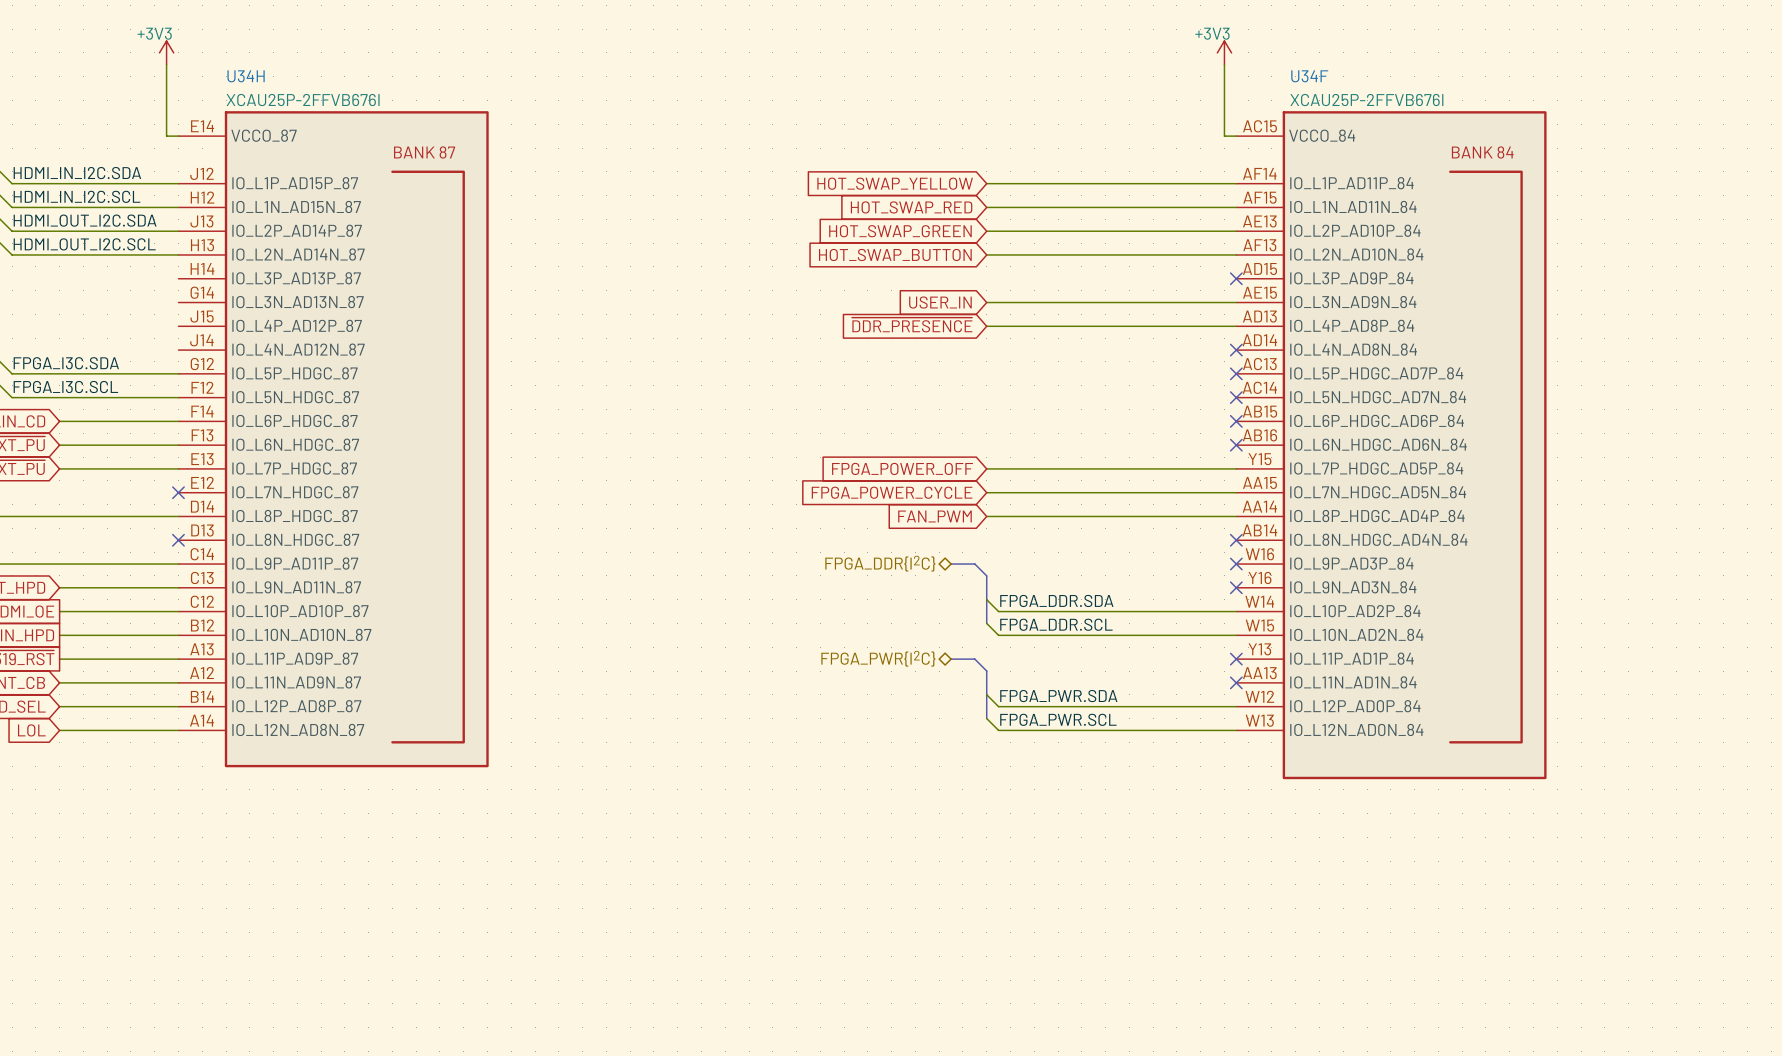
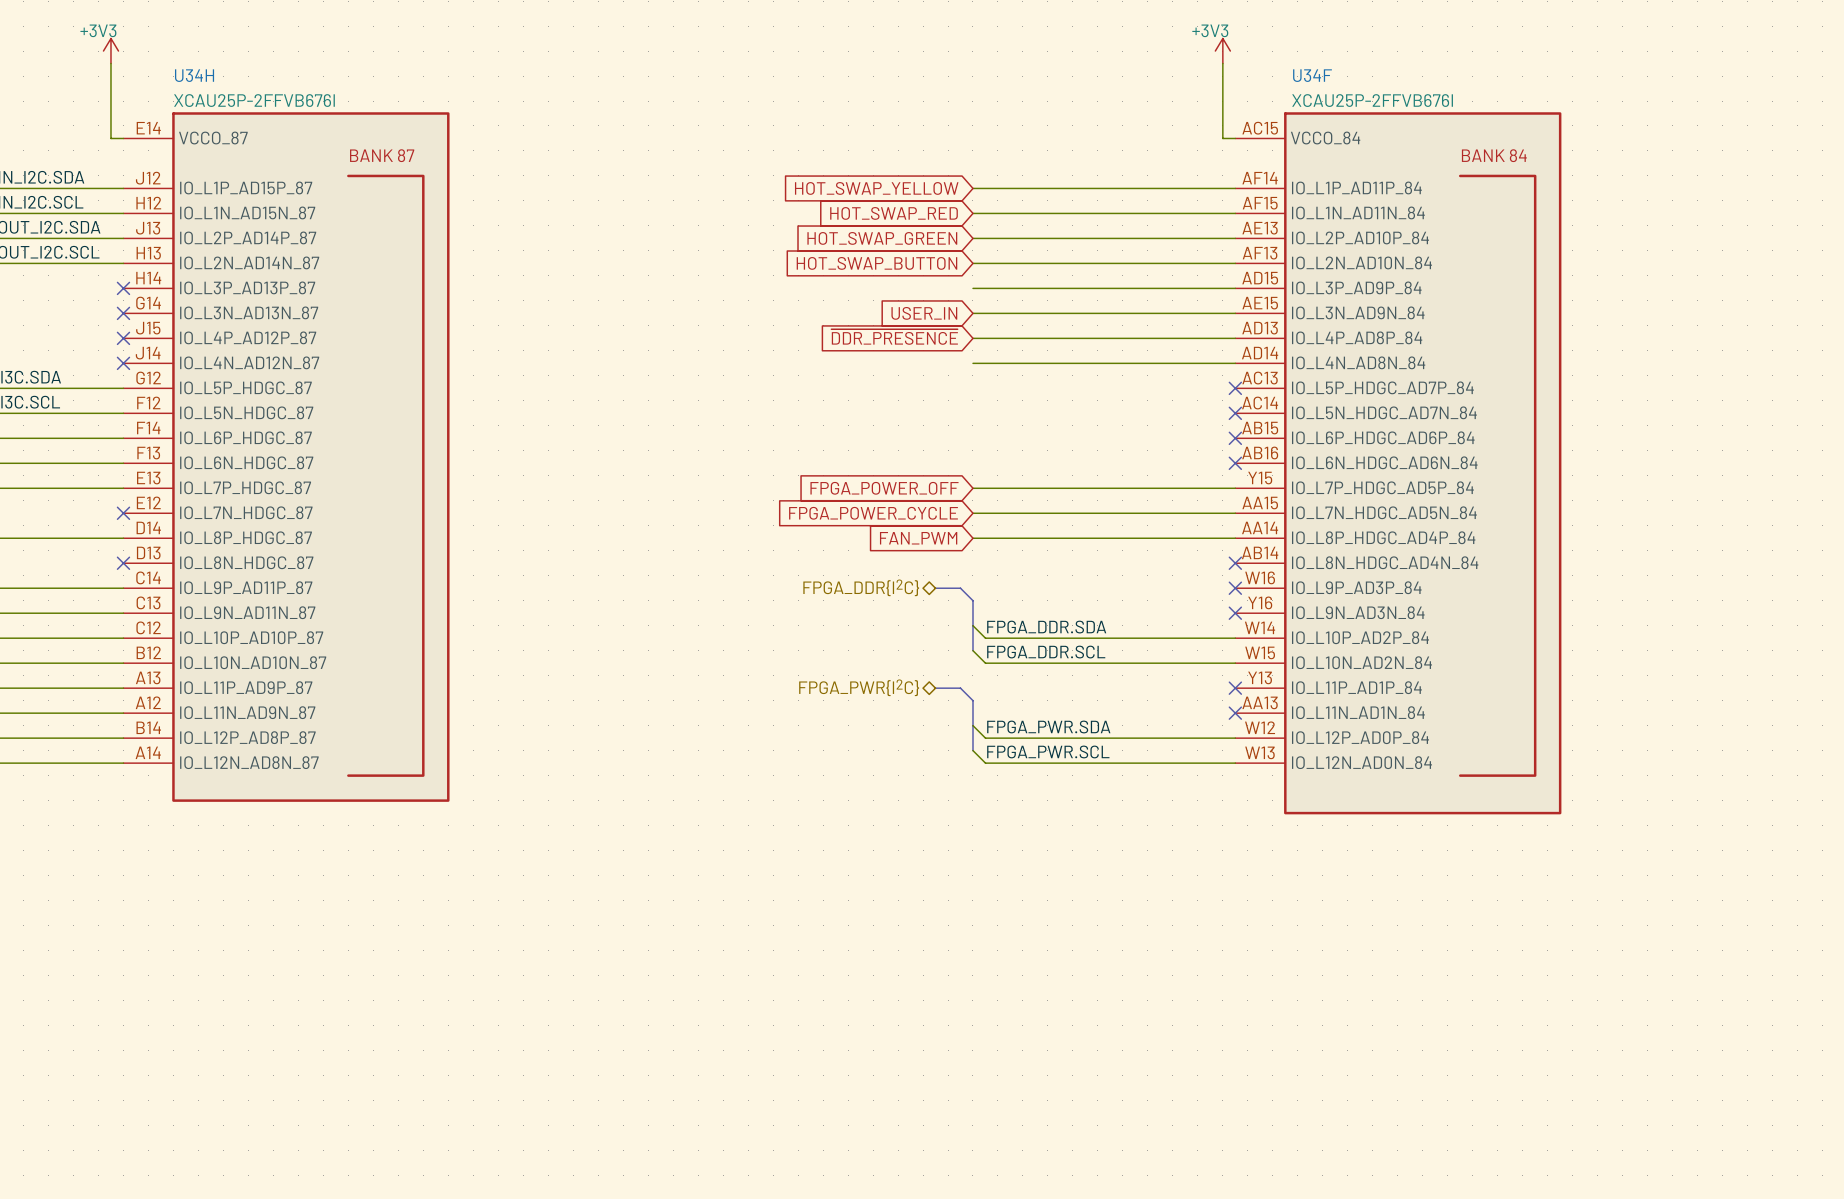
no-connect mark: none -> (123, 288)
wire: none -> (972, 288) (1235, 288)
no-connect mark: (1236, 278) -> none
no-connect mark: none -> (123, 313)
no-connect mark: none -> (123, 338)
no-connect mark: none -> (123, 363)
wire: none -> (972, 363) (1235, 363)
no-connect mark: (1236, 350) -> none

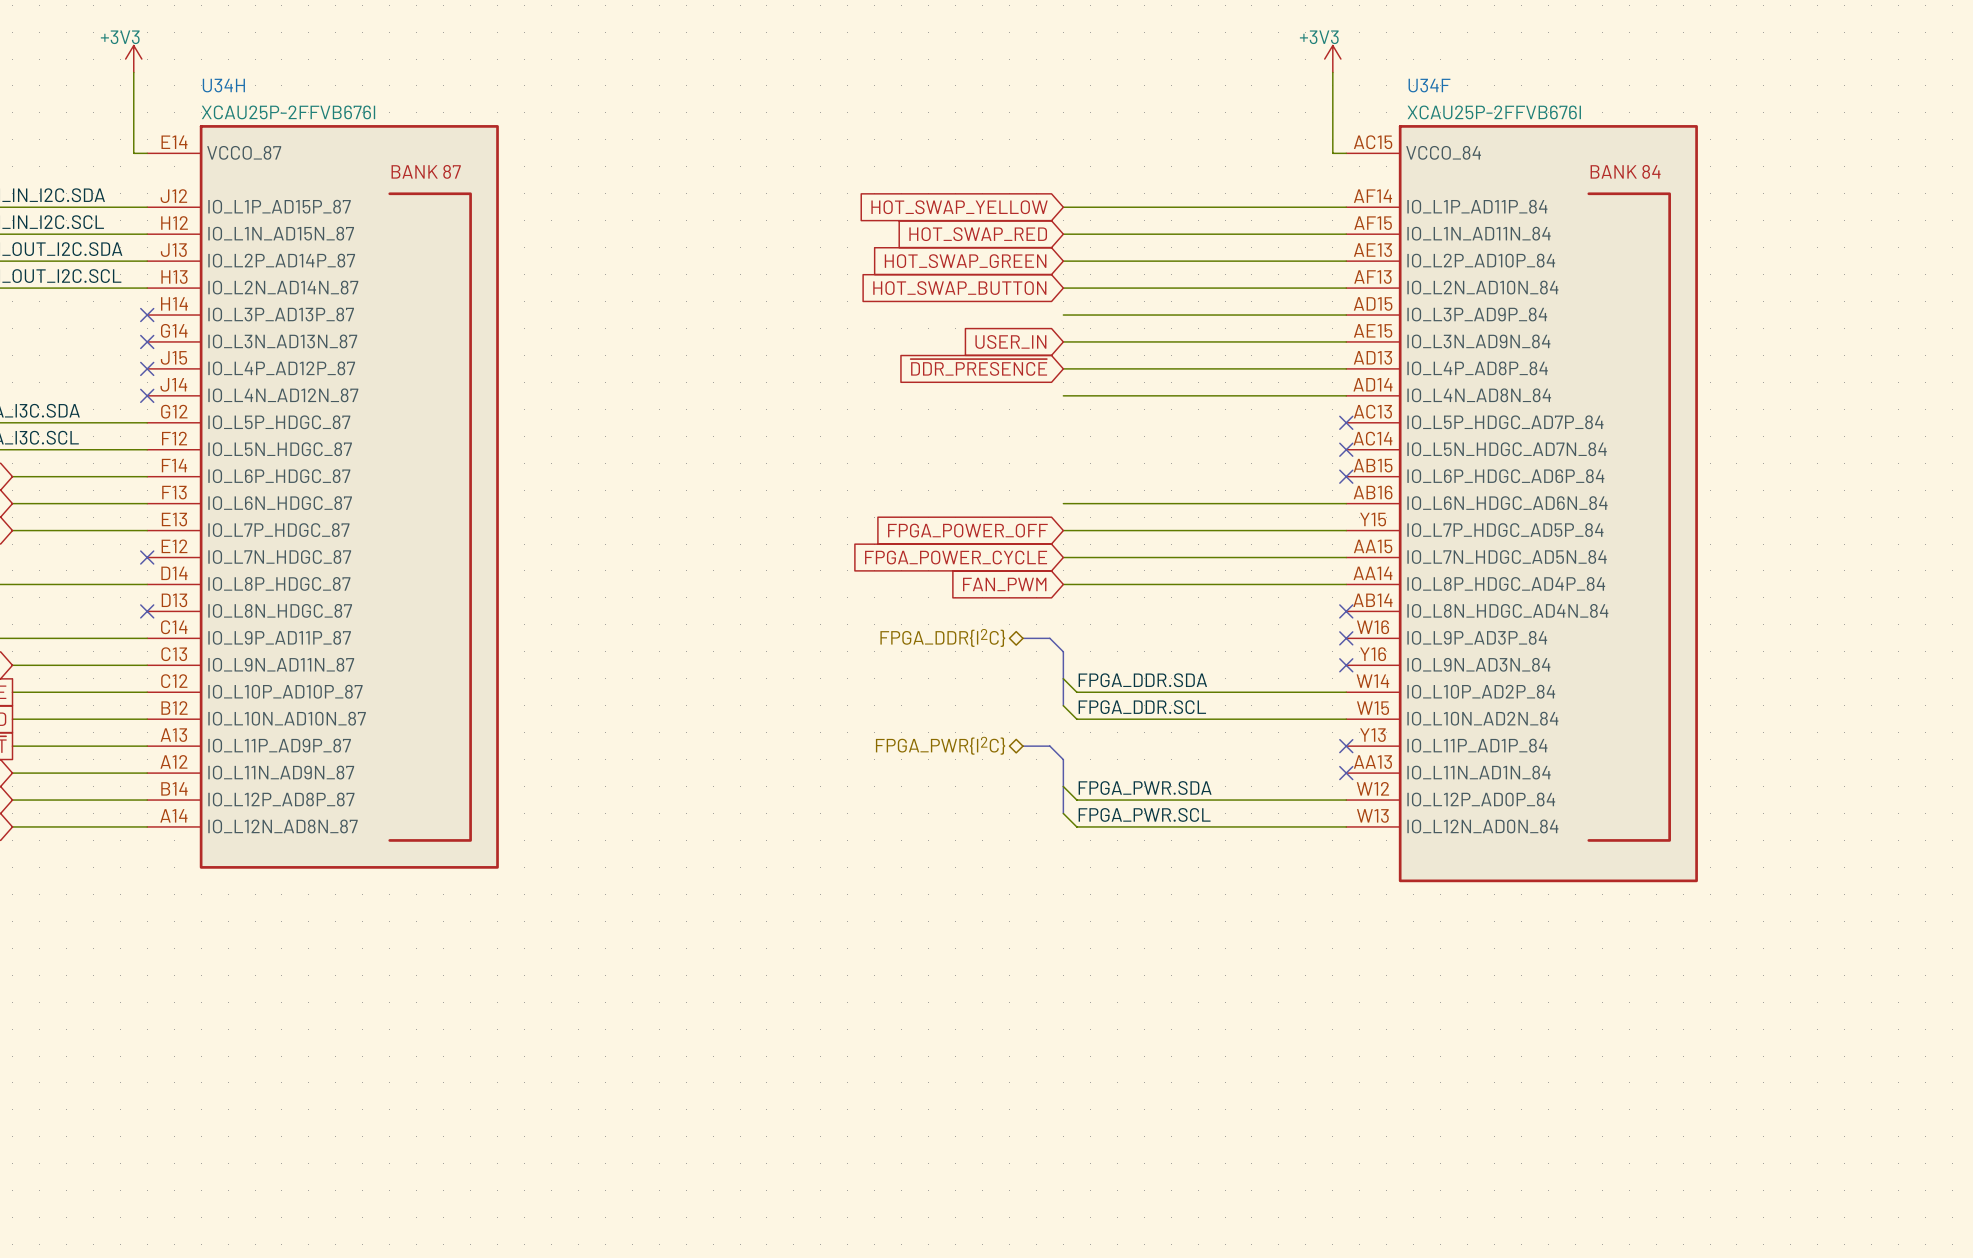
wire: none -> (1063, 503) (1346, 503)
no-connect mark: (1235, 463) -> none

